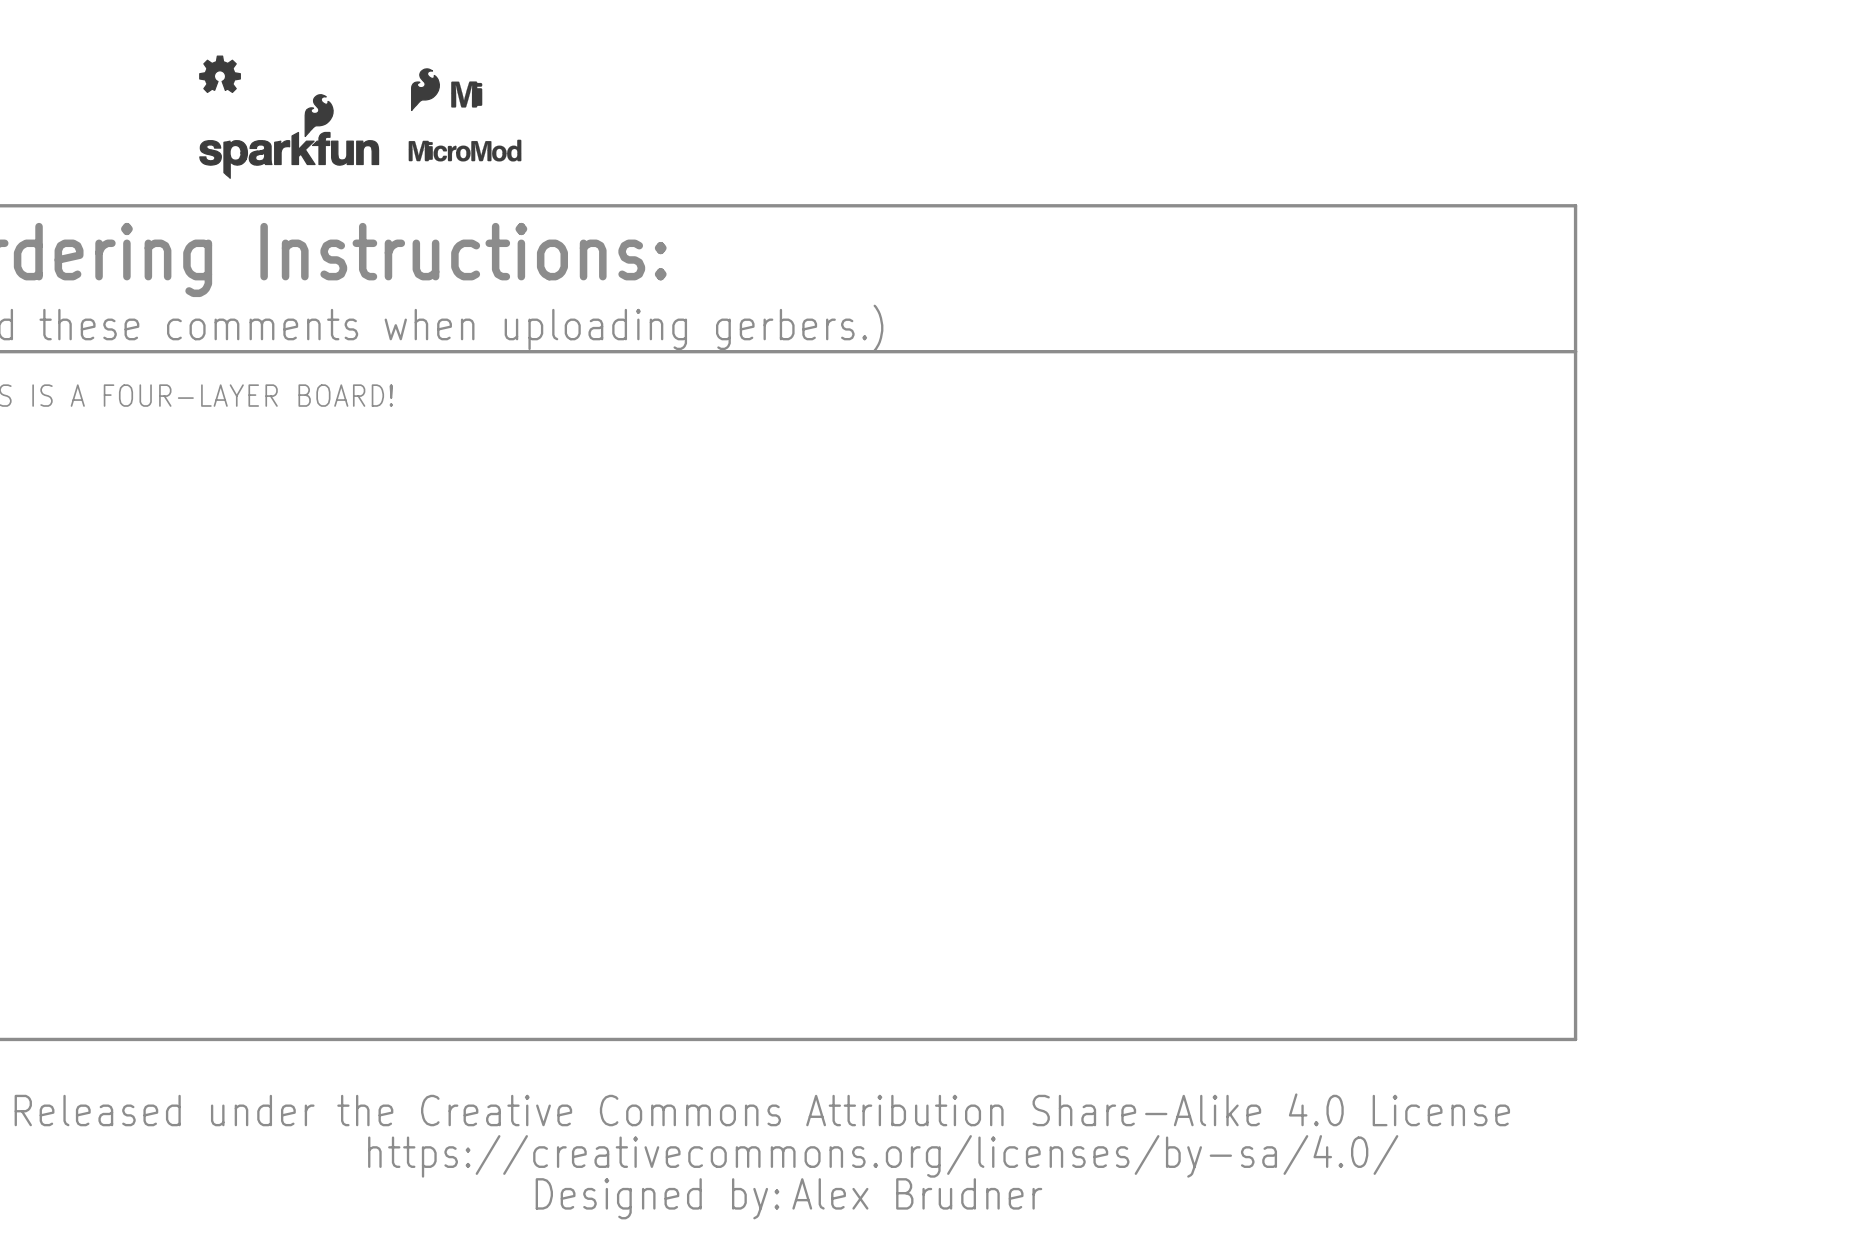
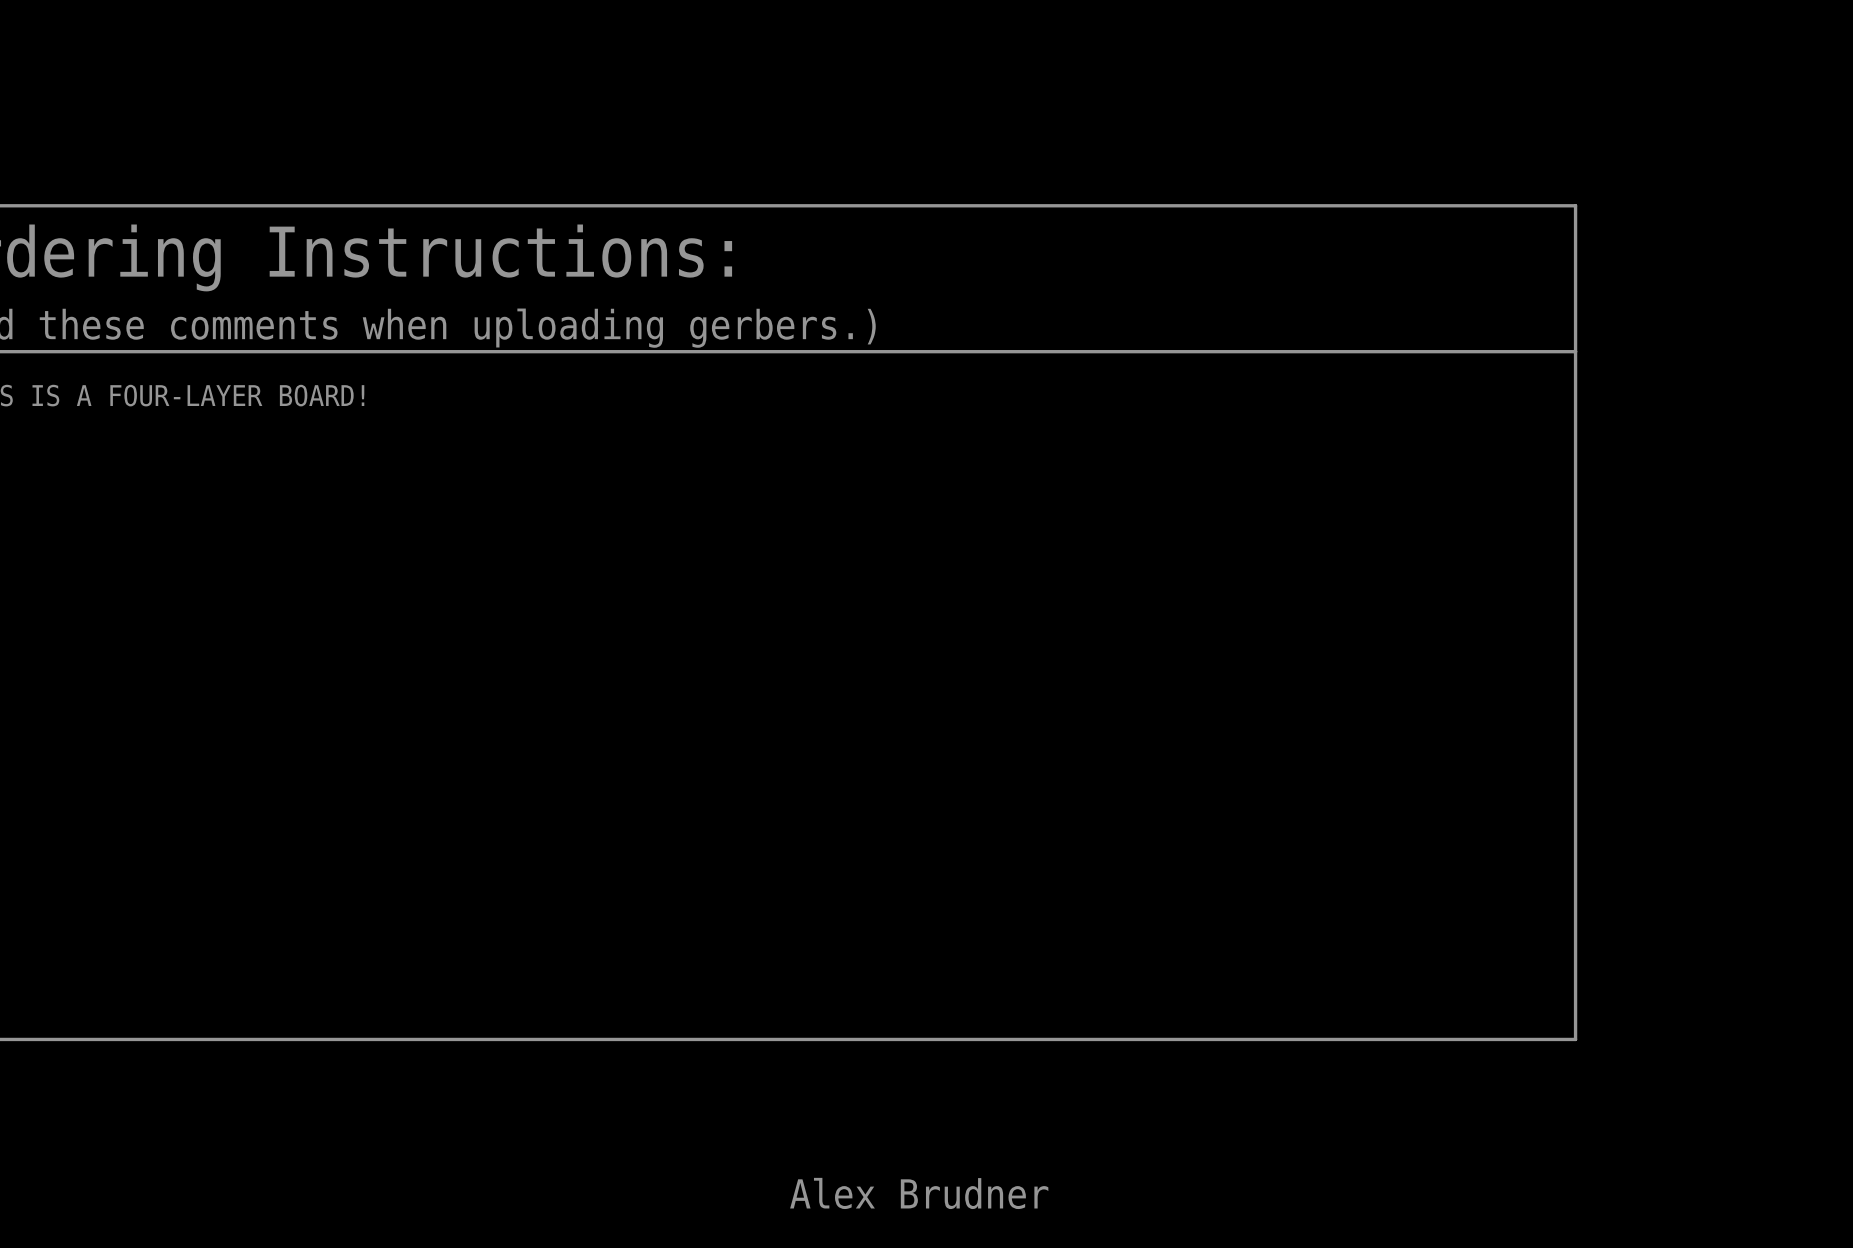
drawing: [199, 55, 380, 179] -> none
drawing: [411, 68, 483, 112] -> none
drawing: [408, 139, 522, 162] -> none
drawing: [14, 1093, 1511, 1220] -> none

